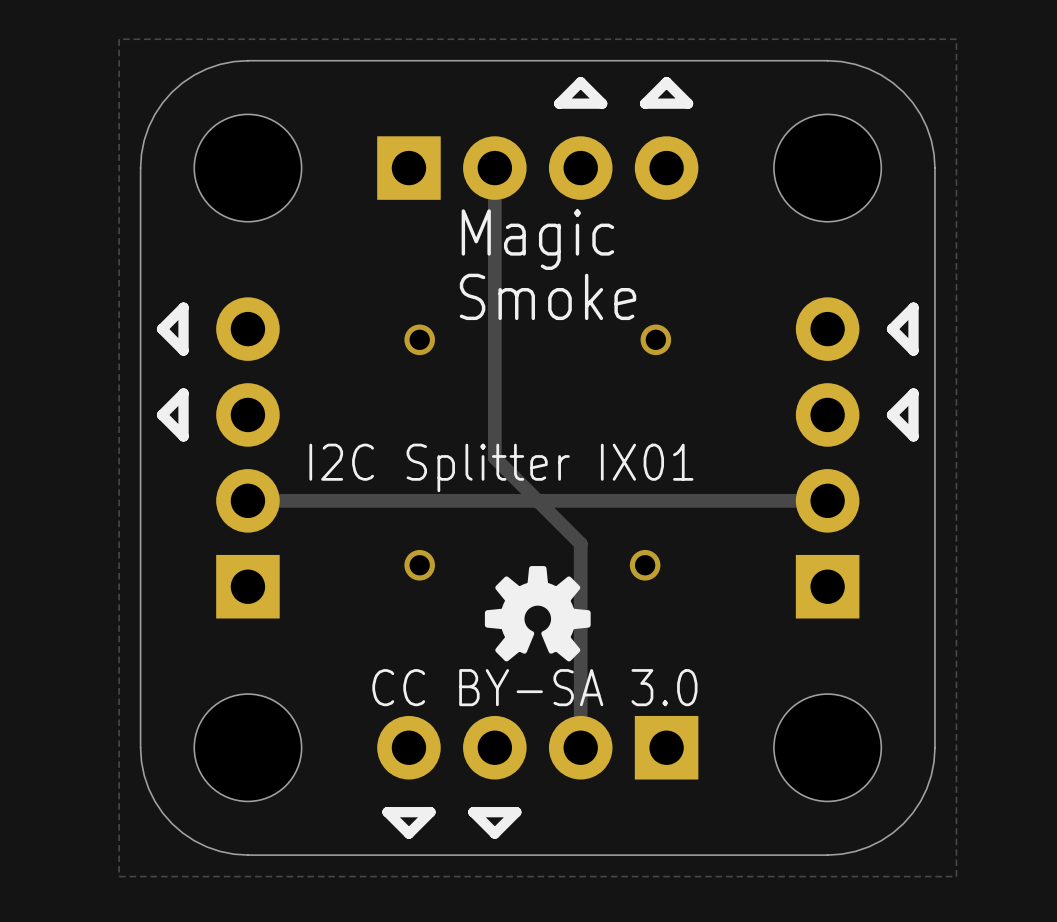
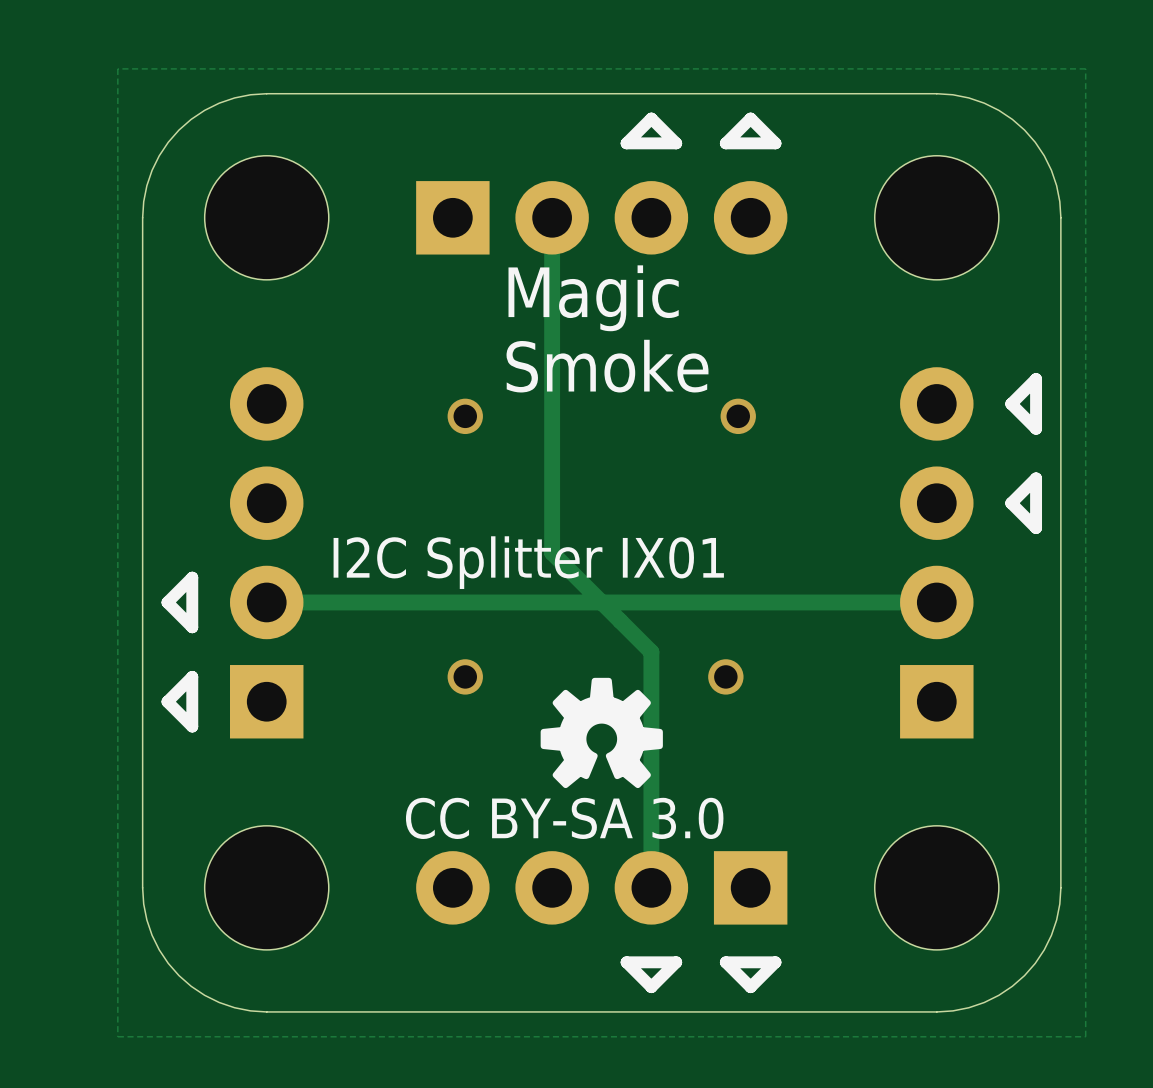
line: (183, 307) (183, 350) (162, 329) (183, 307) -> (192, 676) (192, 726) (167, 701) (192, 676)
line: (183, 393) (162, 414) (183, 436) (183, 393) -> (192, 577) (167, 602) (192, 627) (192, 577)
line: (430, 812) (387, 812) (408, 833) (430, 812) -> (775, 962) (725, 962) (750, 987) (775, 962)
line: (516, 812) (473, 812) (494, 833) (516, 812) -> (676, 962) (626, 962) (651, 987) (676, 962)

